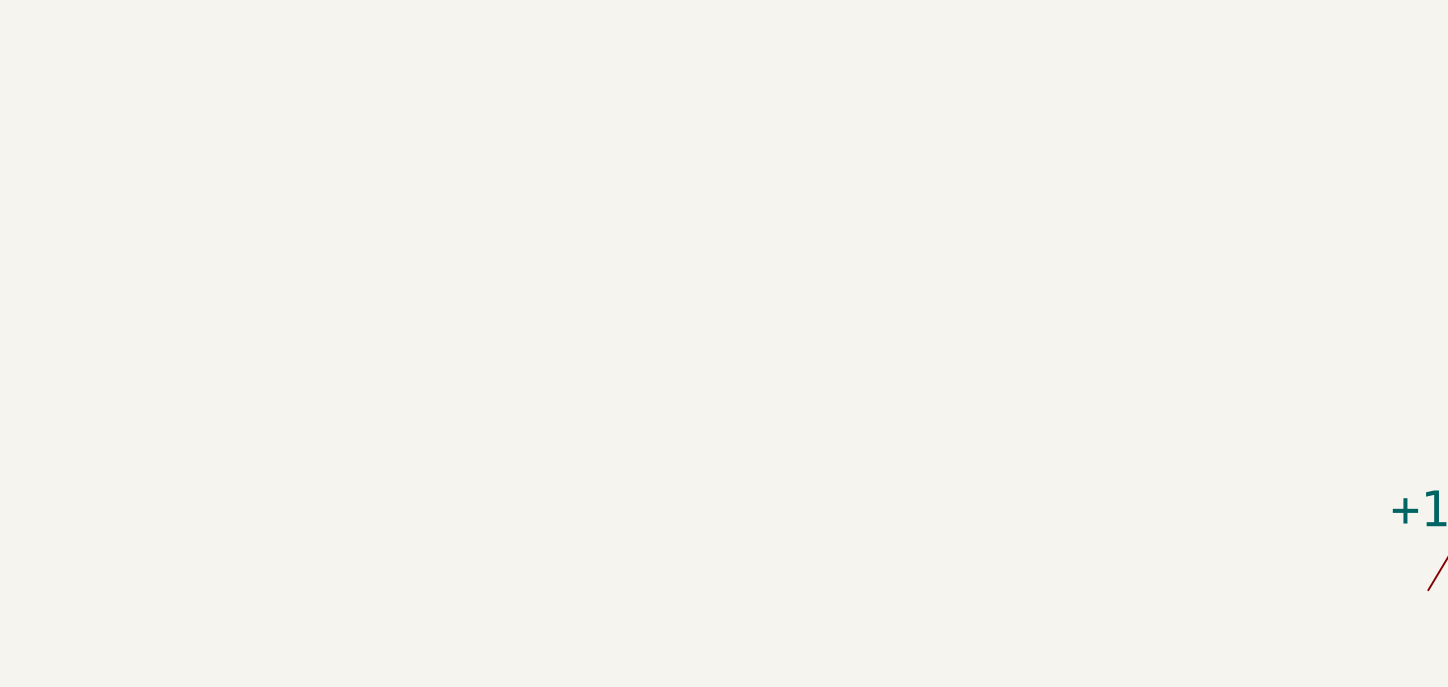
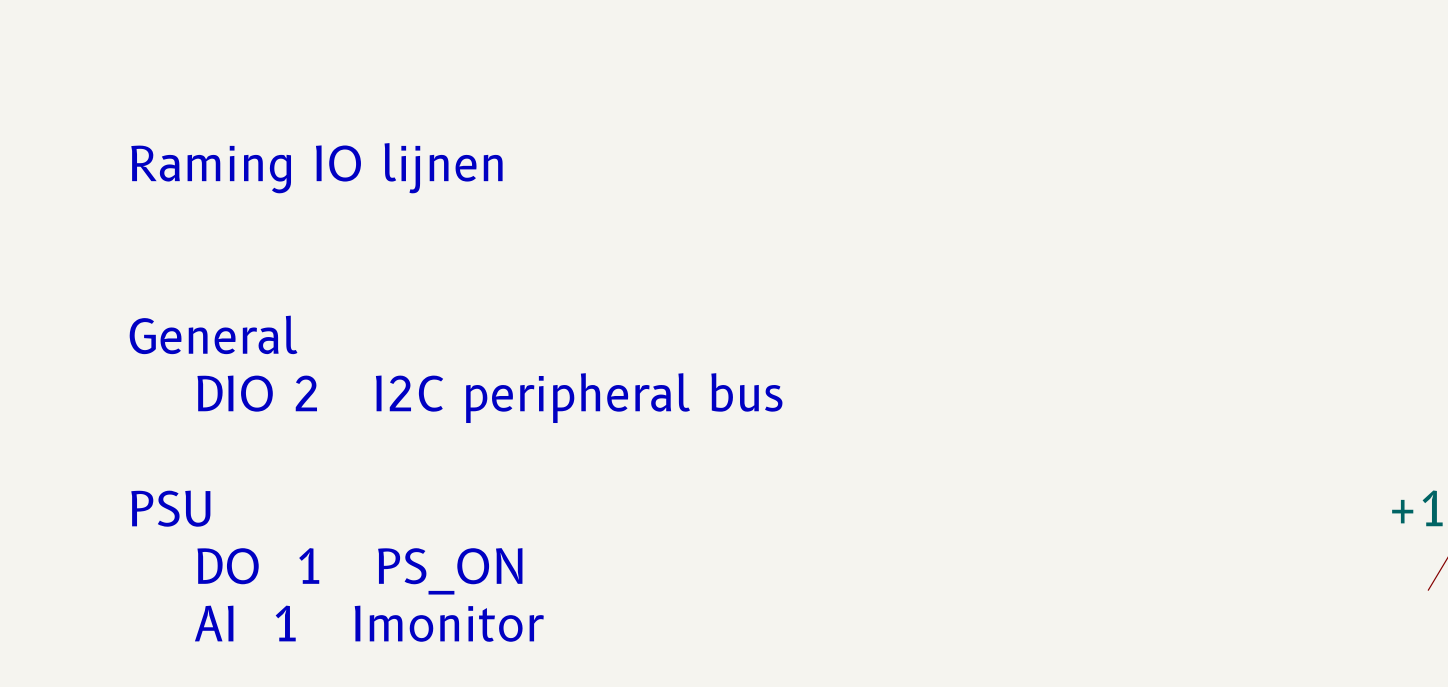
text: none -> Raming IO lijnen (316, 168)
text: none -> General (213, 334)
text: none -> DIO 2 I2C peripheral bus (489, 398)
text: none -> PSU (170, 508)
text: none -> DO 1 PS_ON (359, 571)
text: none -> AI 1 Imonitor (369, 623)

